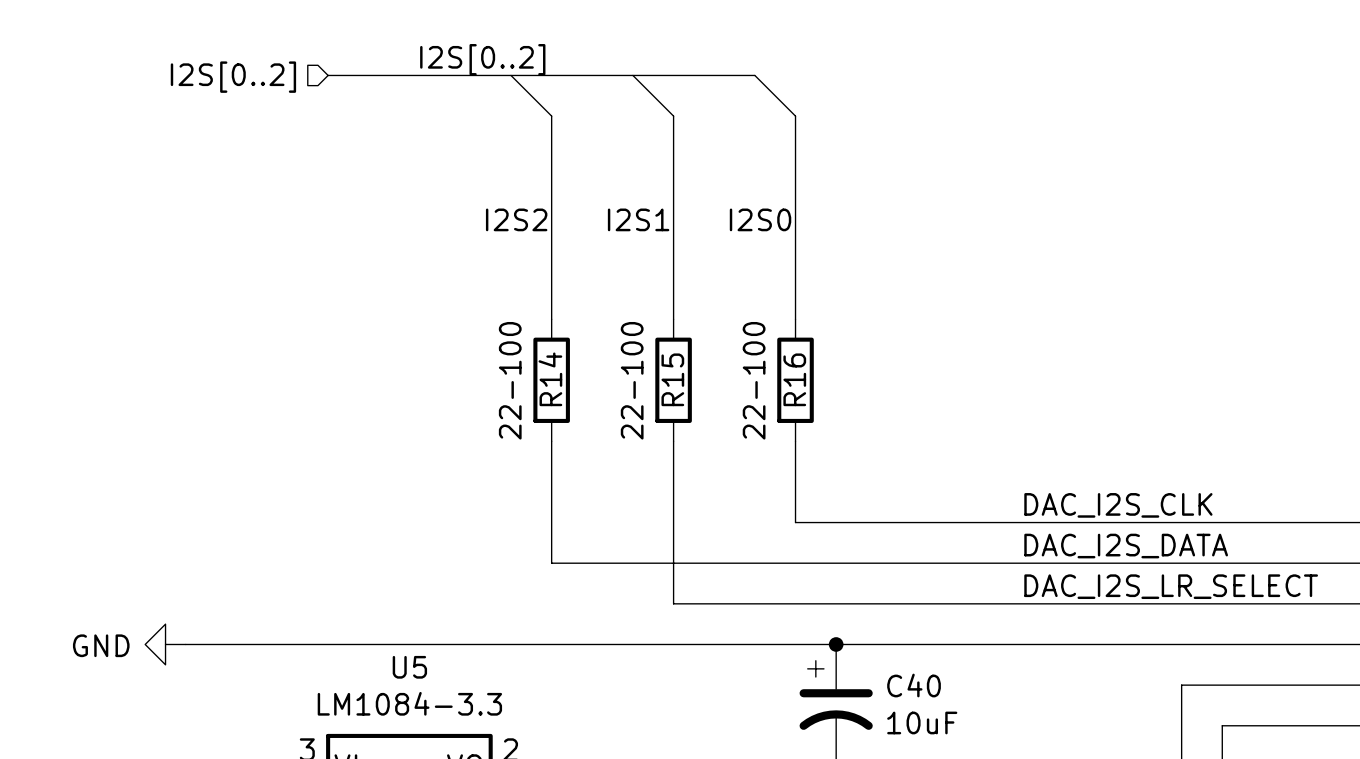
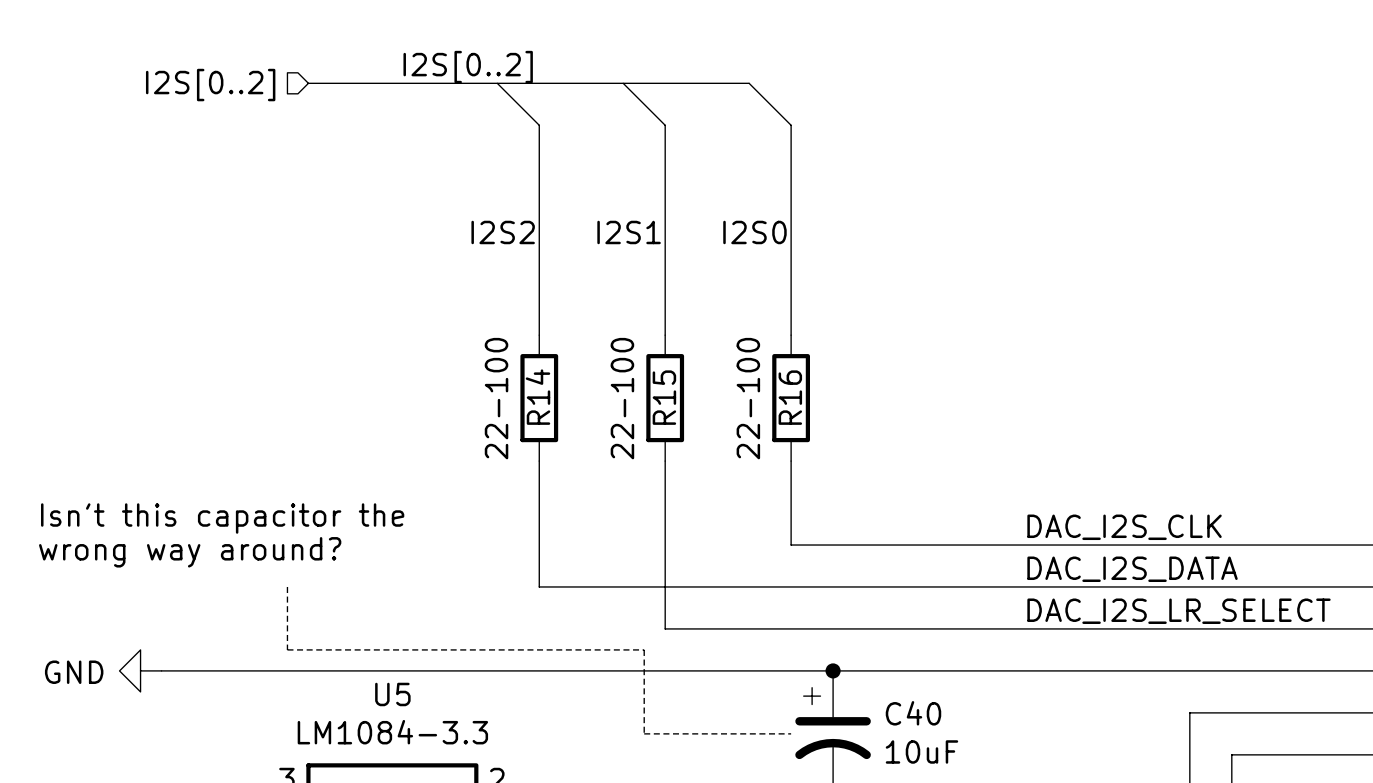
text: none -> Isn't this capacitor the (222, 518)
text: none -> wrong way around? (190, 552)
line: none -> (287, 586) (287, 649) (644, 649) (644, 733) (791, 733)

